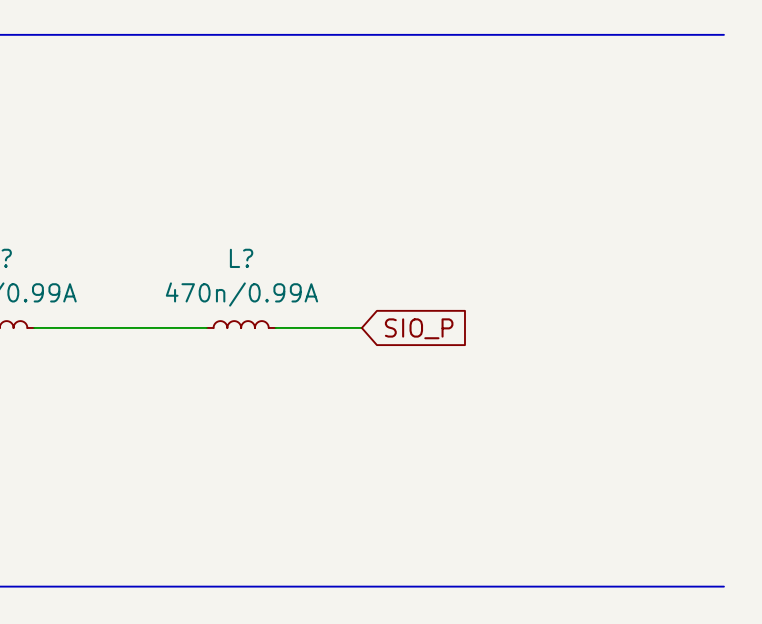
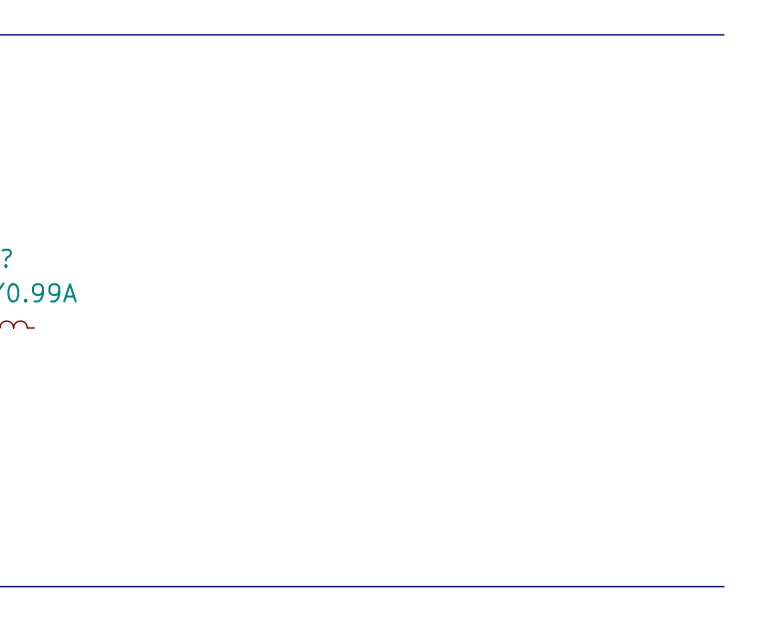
L?: (241, 324) -> none
wire: (34, 327) (206, 327) -> none
wire: (275, 327) (361, 327) -> none
global label: SIO_P (419, 328) -> none

